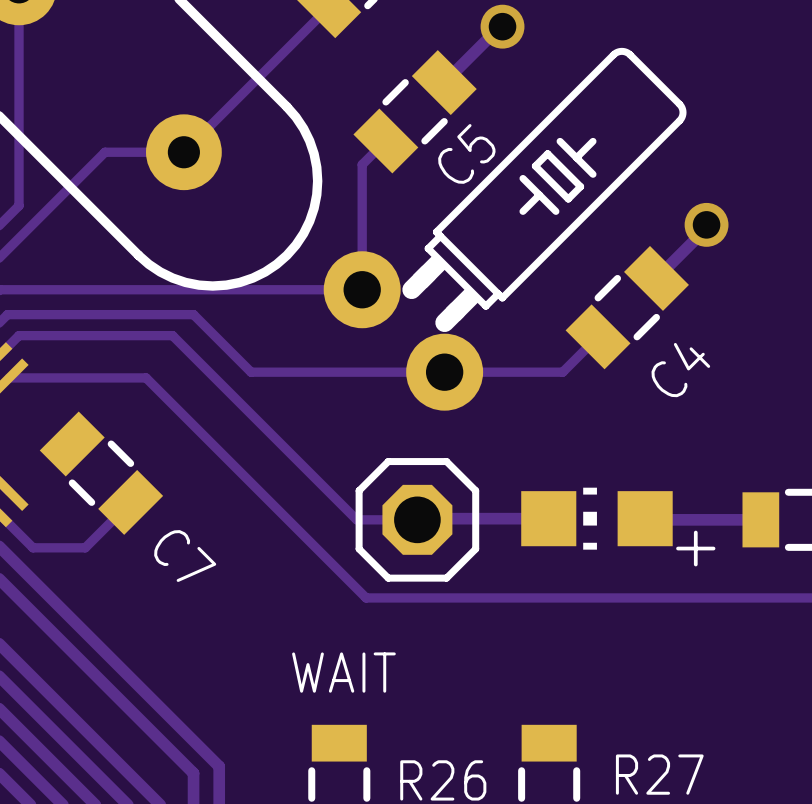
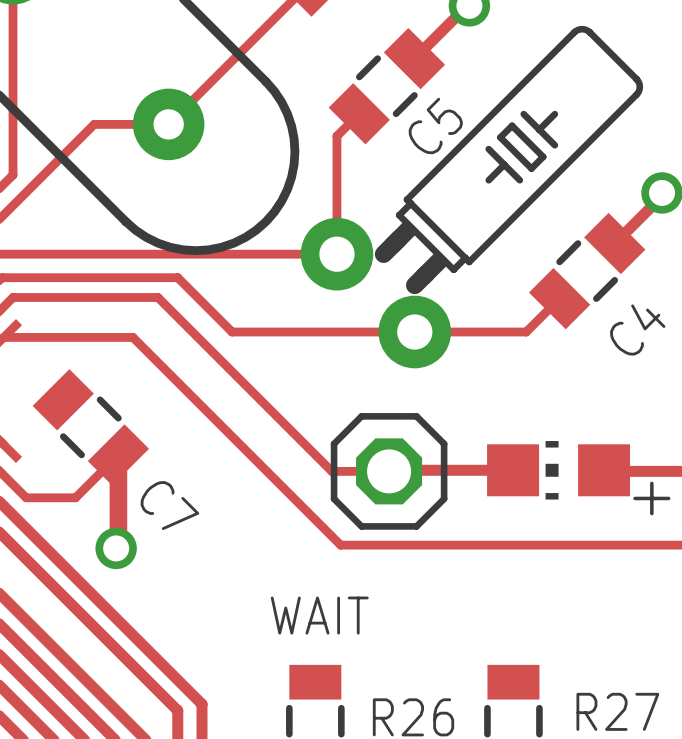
track: none -> (118, 454) (118, 546) (116, 548)
via: none -> (116, 548)

